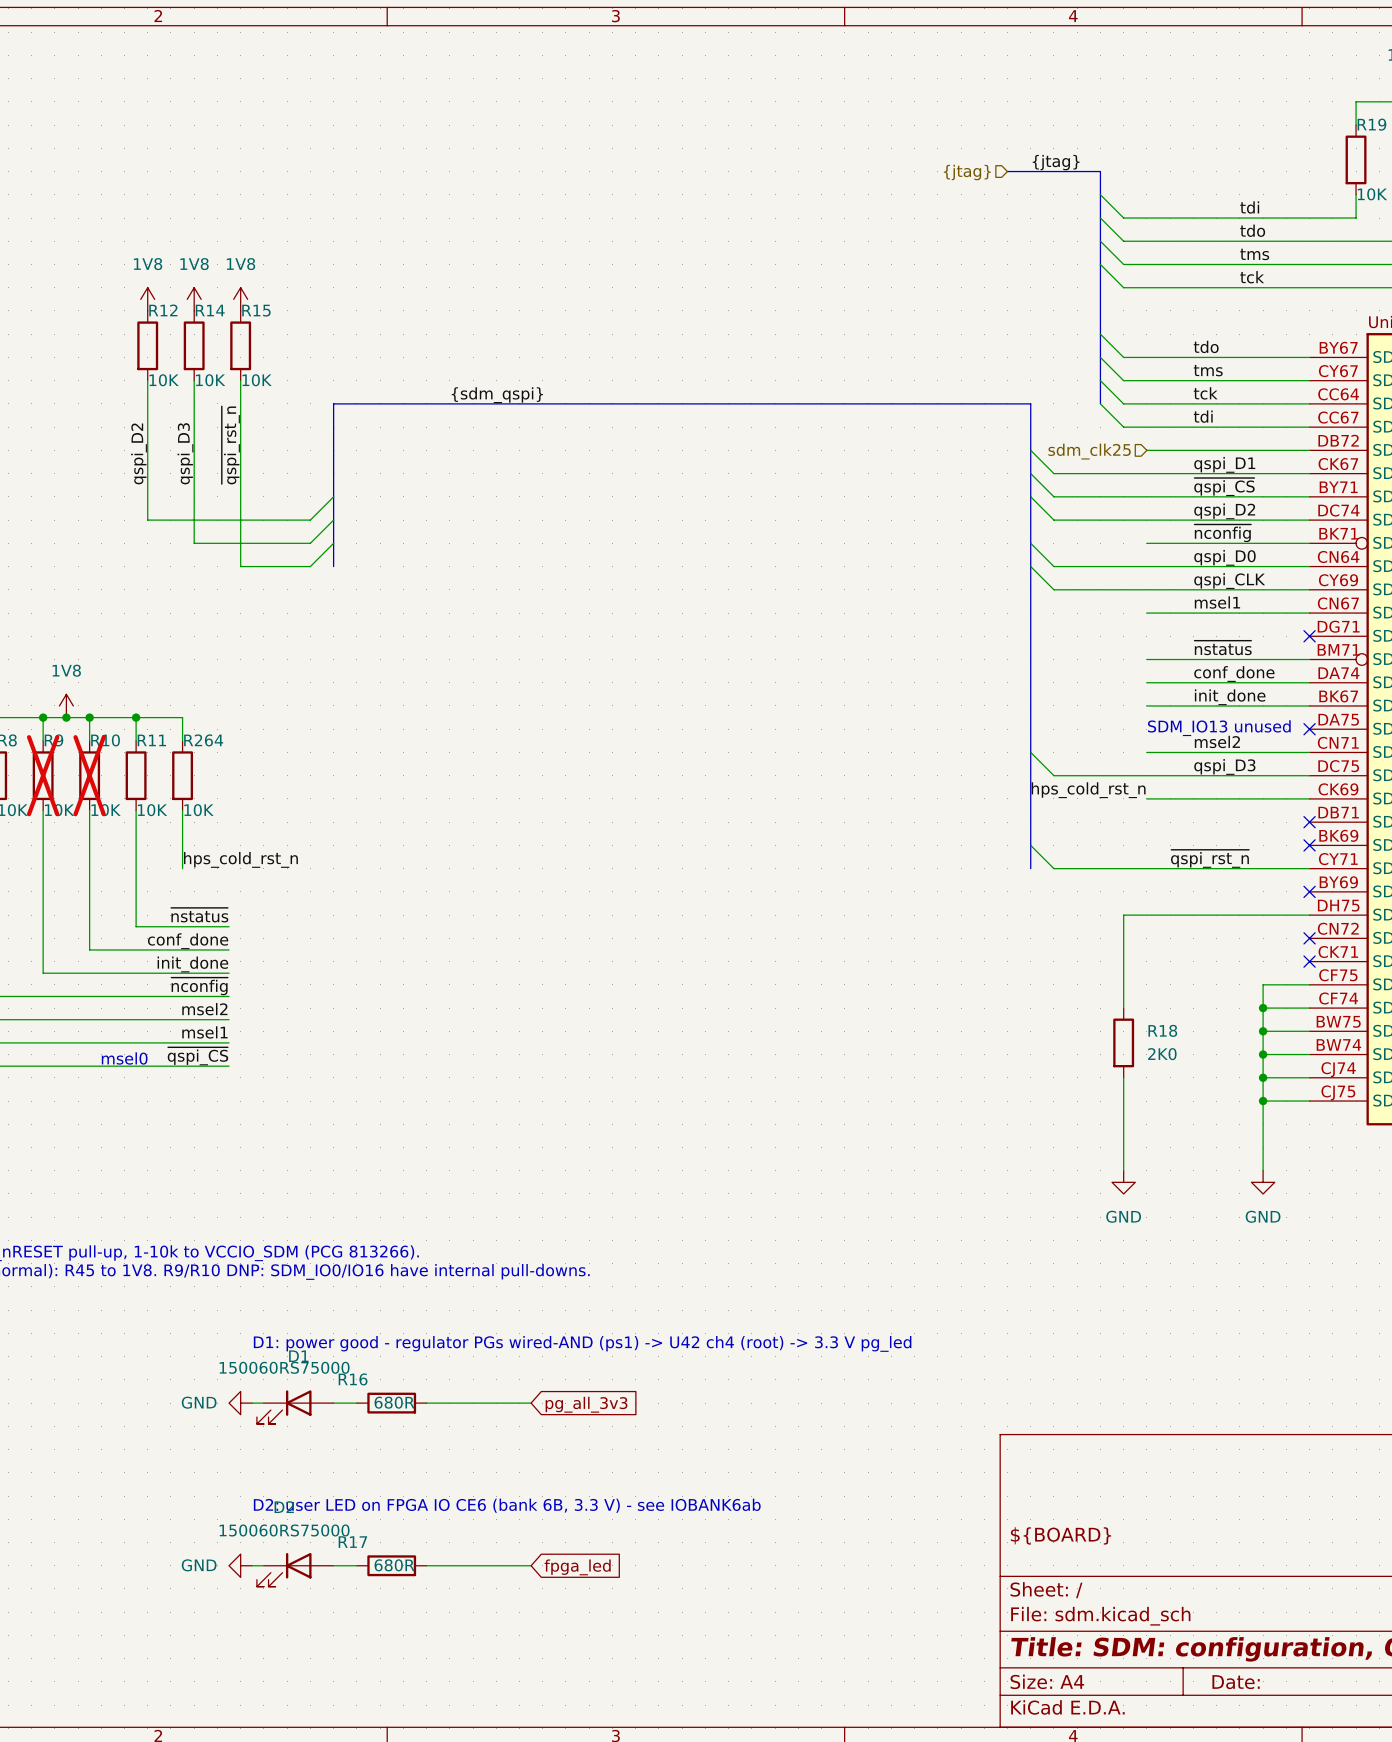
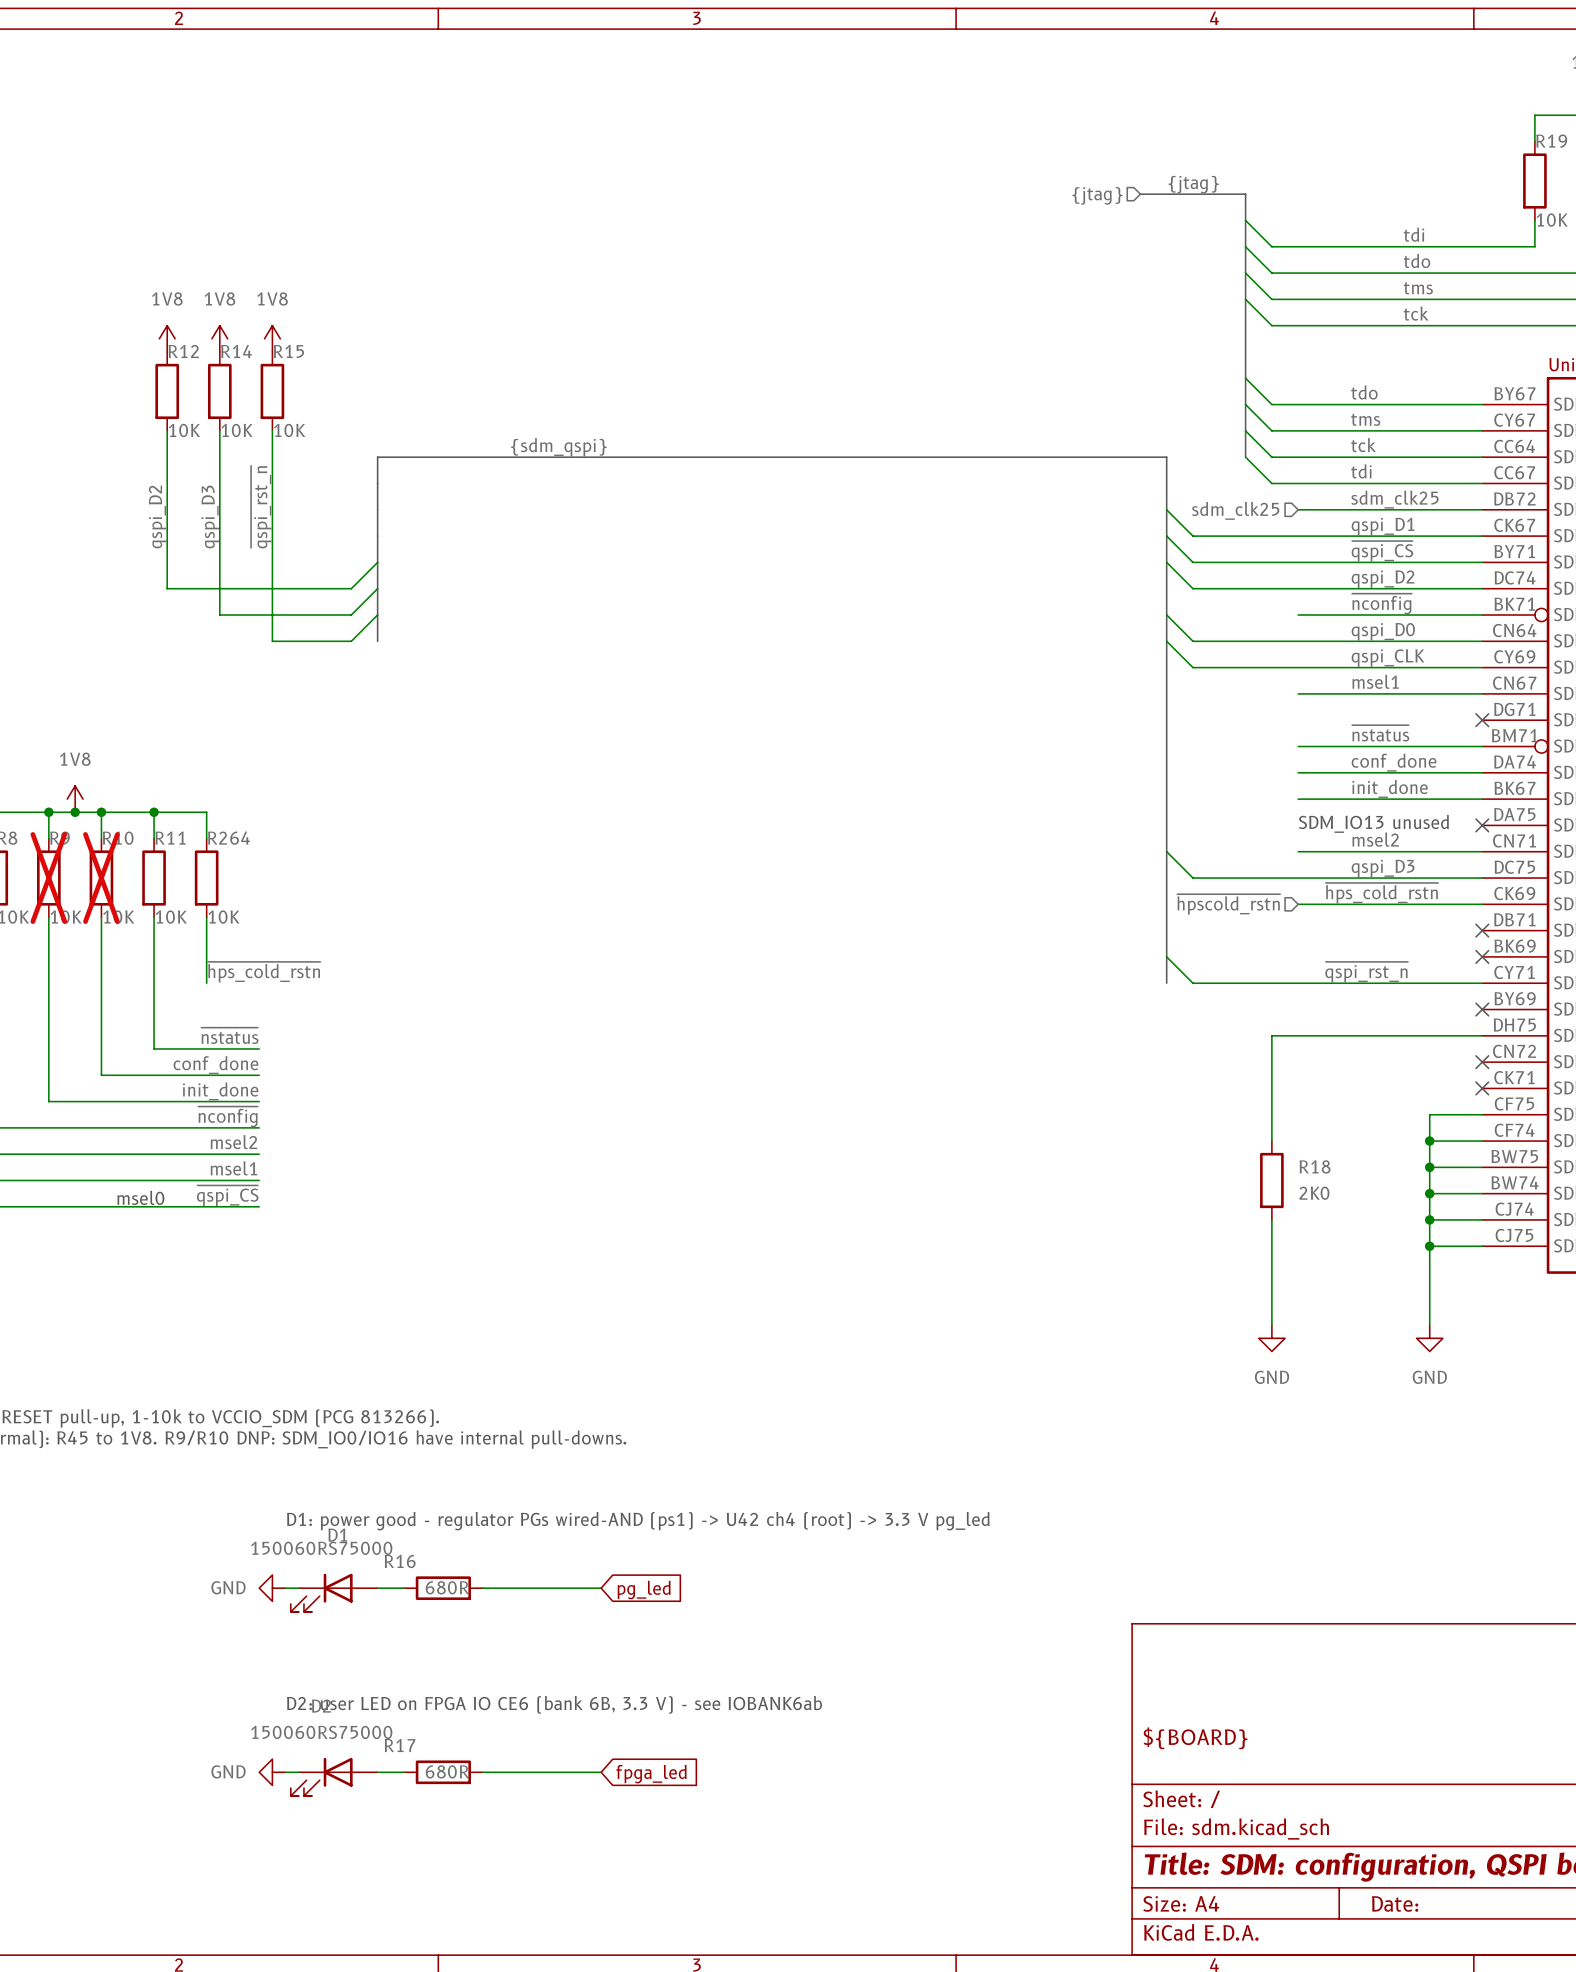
label: none -> sdm_clk25 (1394, 499)
label: none -> ~{hps_cold_rstn} (1382, 893)
label: hps_cold_rst_n (1088, 790) -> none
hierarchical label: none -> ~{hpscold_rstn} (1228, 904)
label: hps_cold_rst_n (240, 859) -> ~{hps_cold_rstn} (264, 972)
global label: pg_all_3v3 (586, 1404) -> pg_led (644, 1589)

